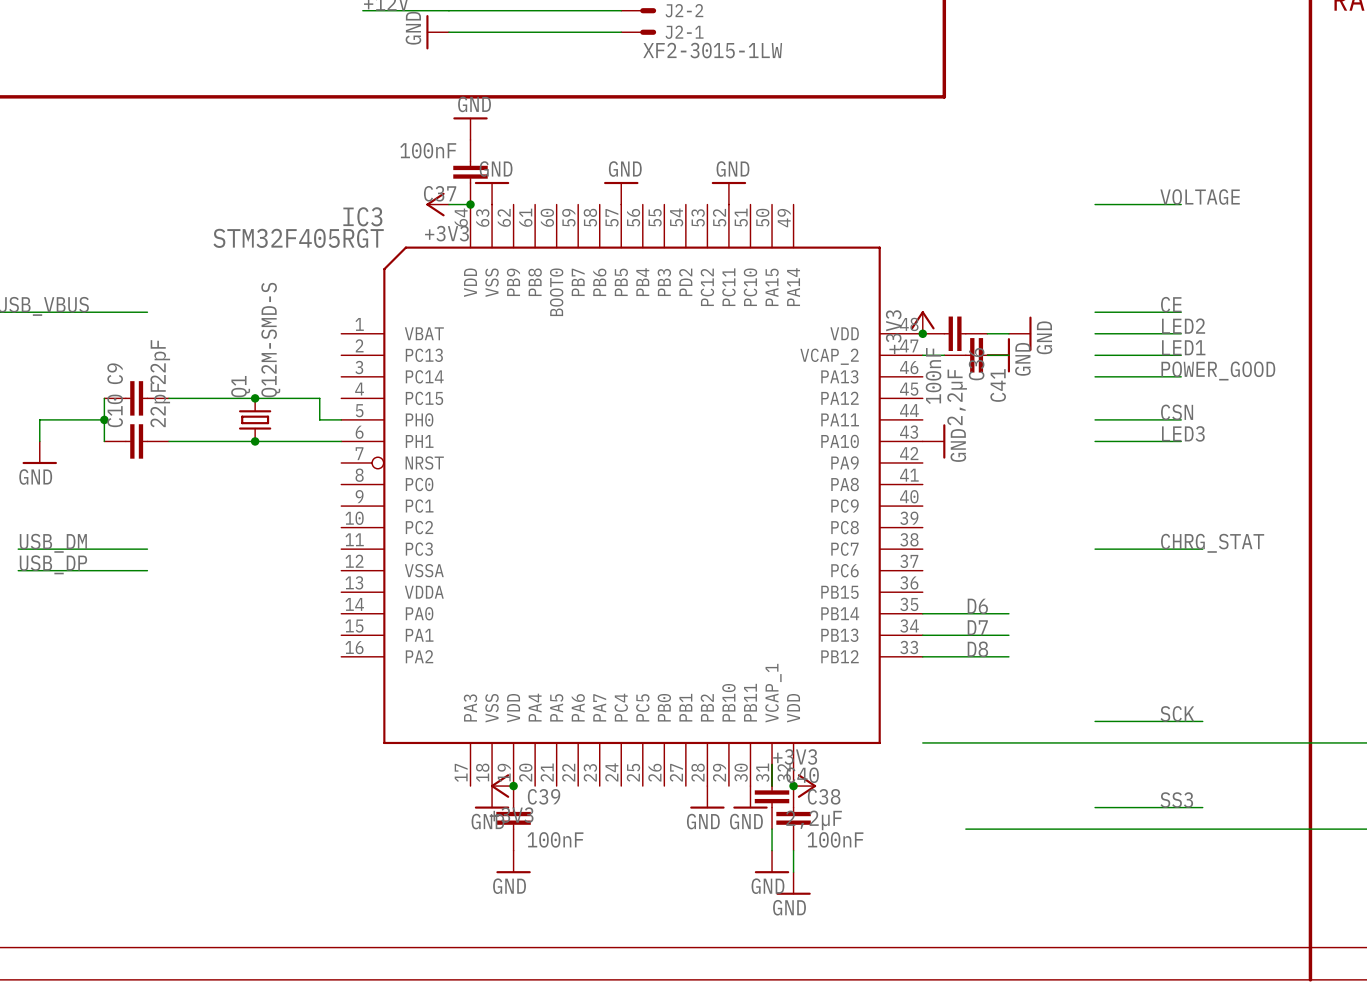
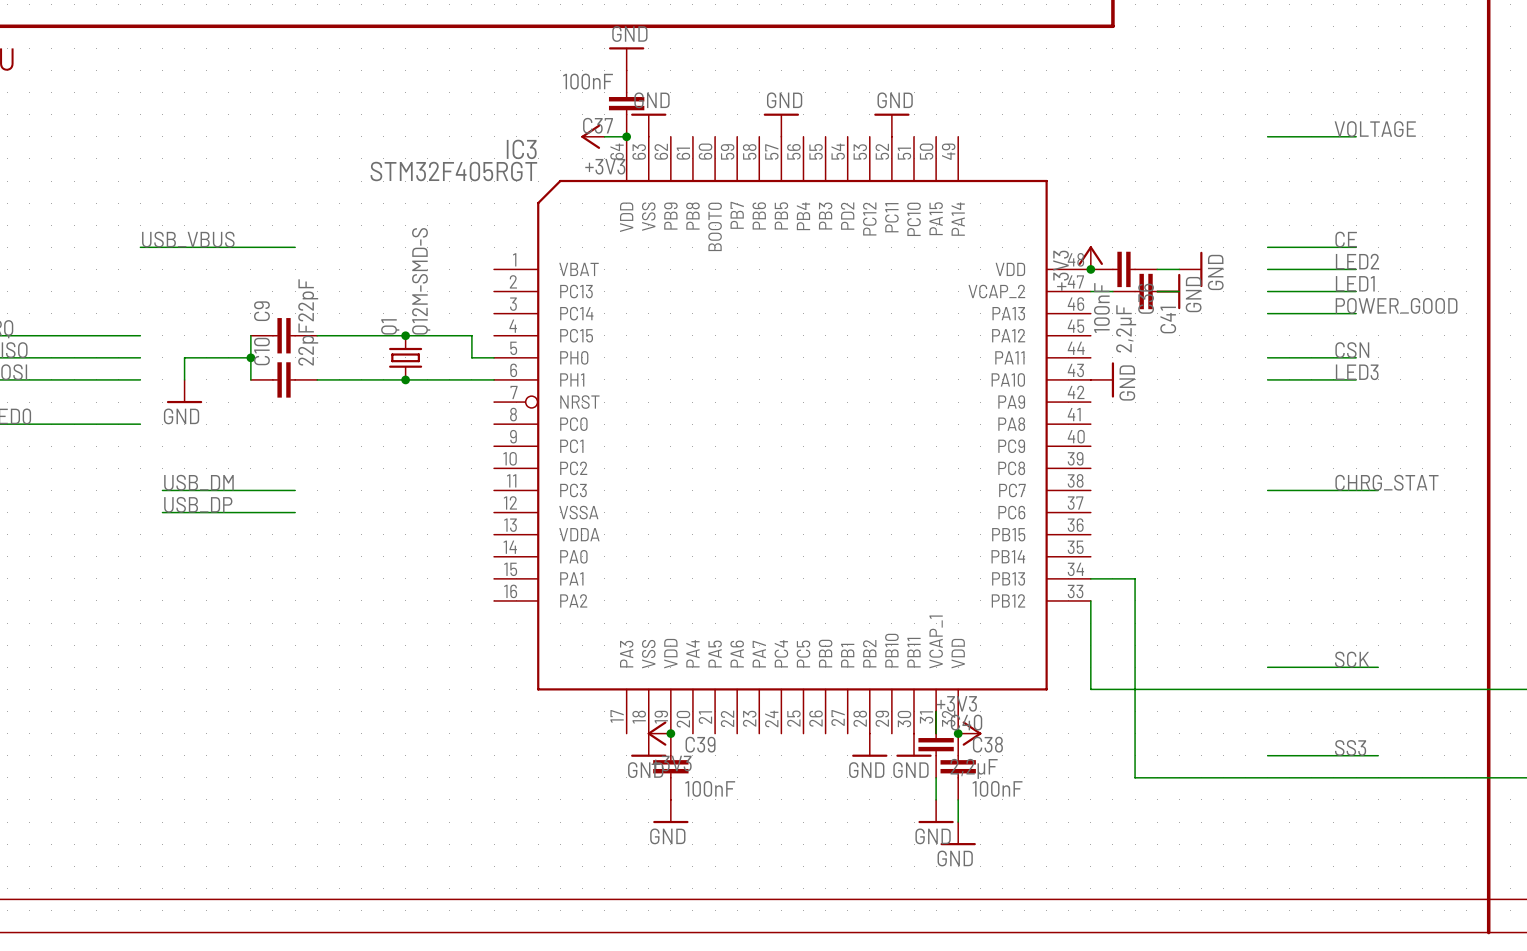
label: D6 (977, 606) -> none
wire: (922, 613) (1008, 613) -> none
label: D7 (977, 627) -> none
wire: (965, 635) (1008, 635) -> (1135, 578) (1135, 777)
label: D8 (977, 649) -> none
wire: (922, 656) (1008, 656) -> (1090, 600) (1090, 689)

